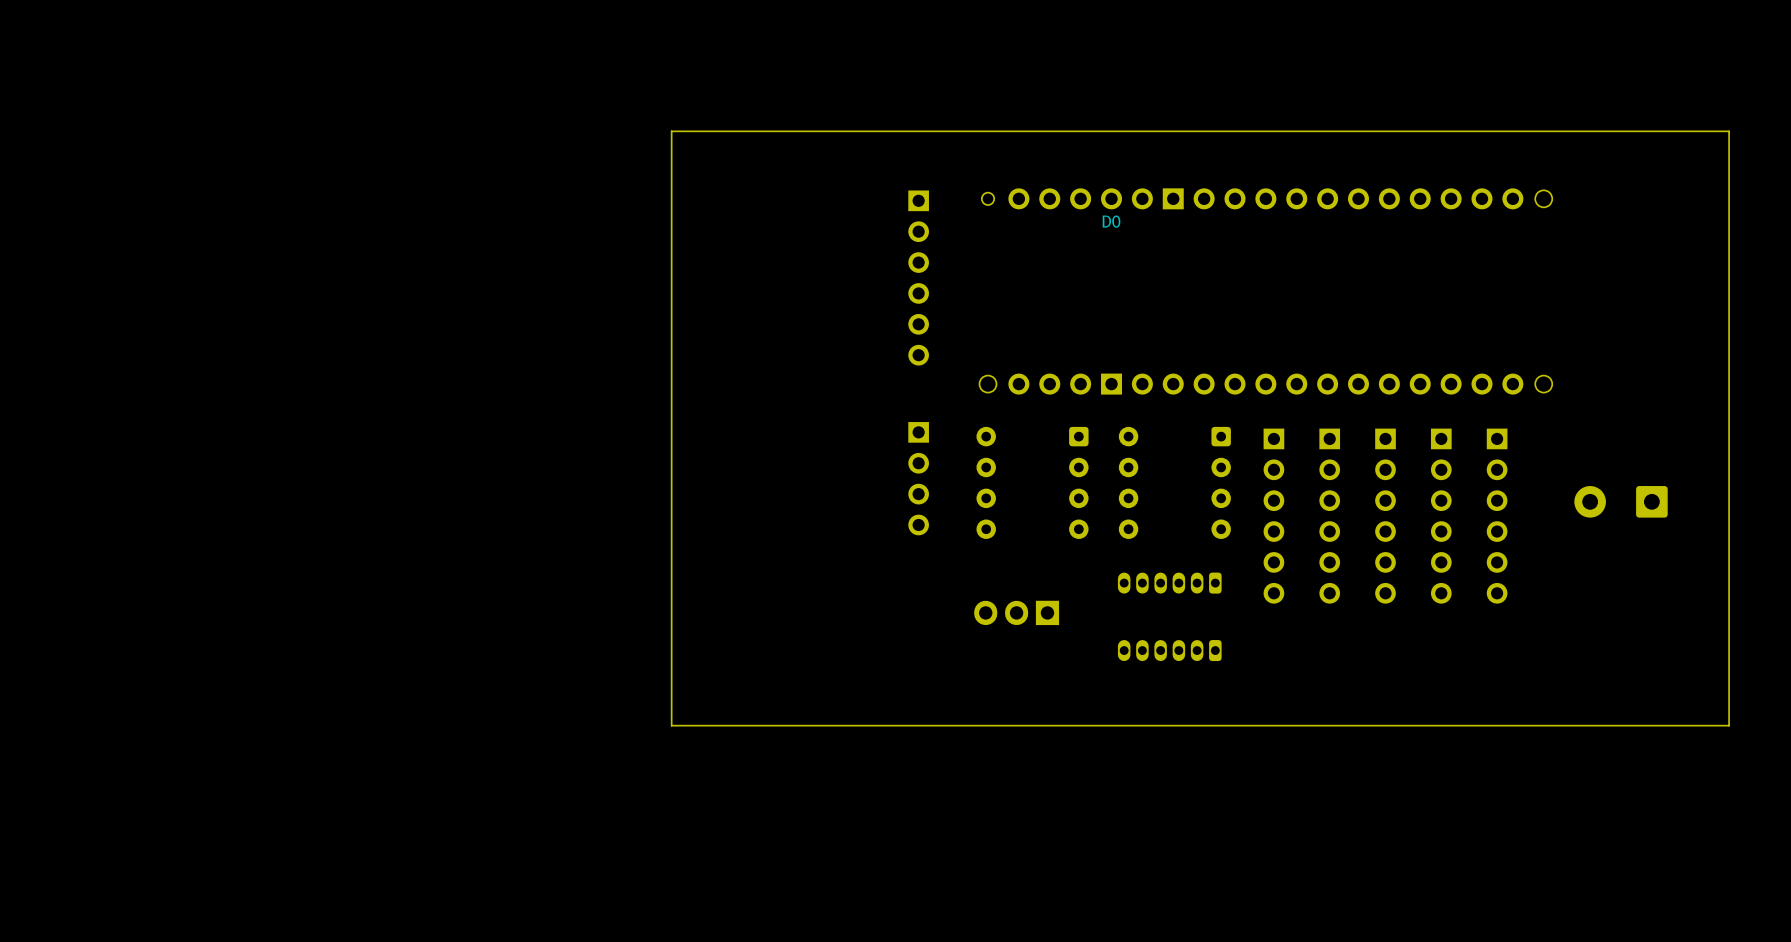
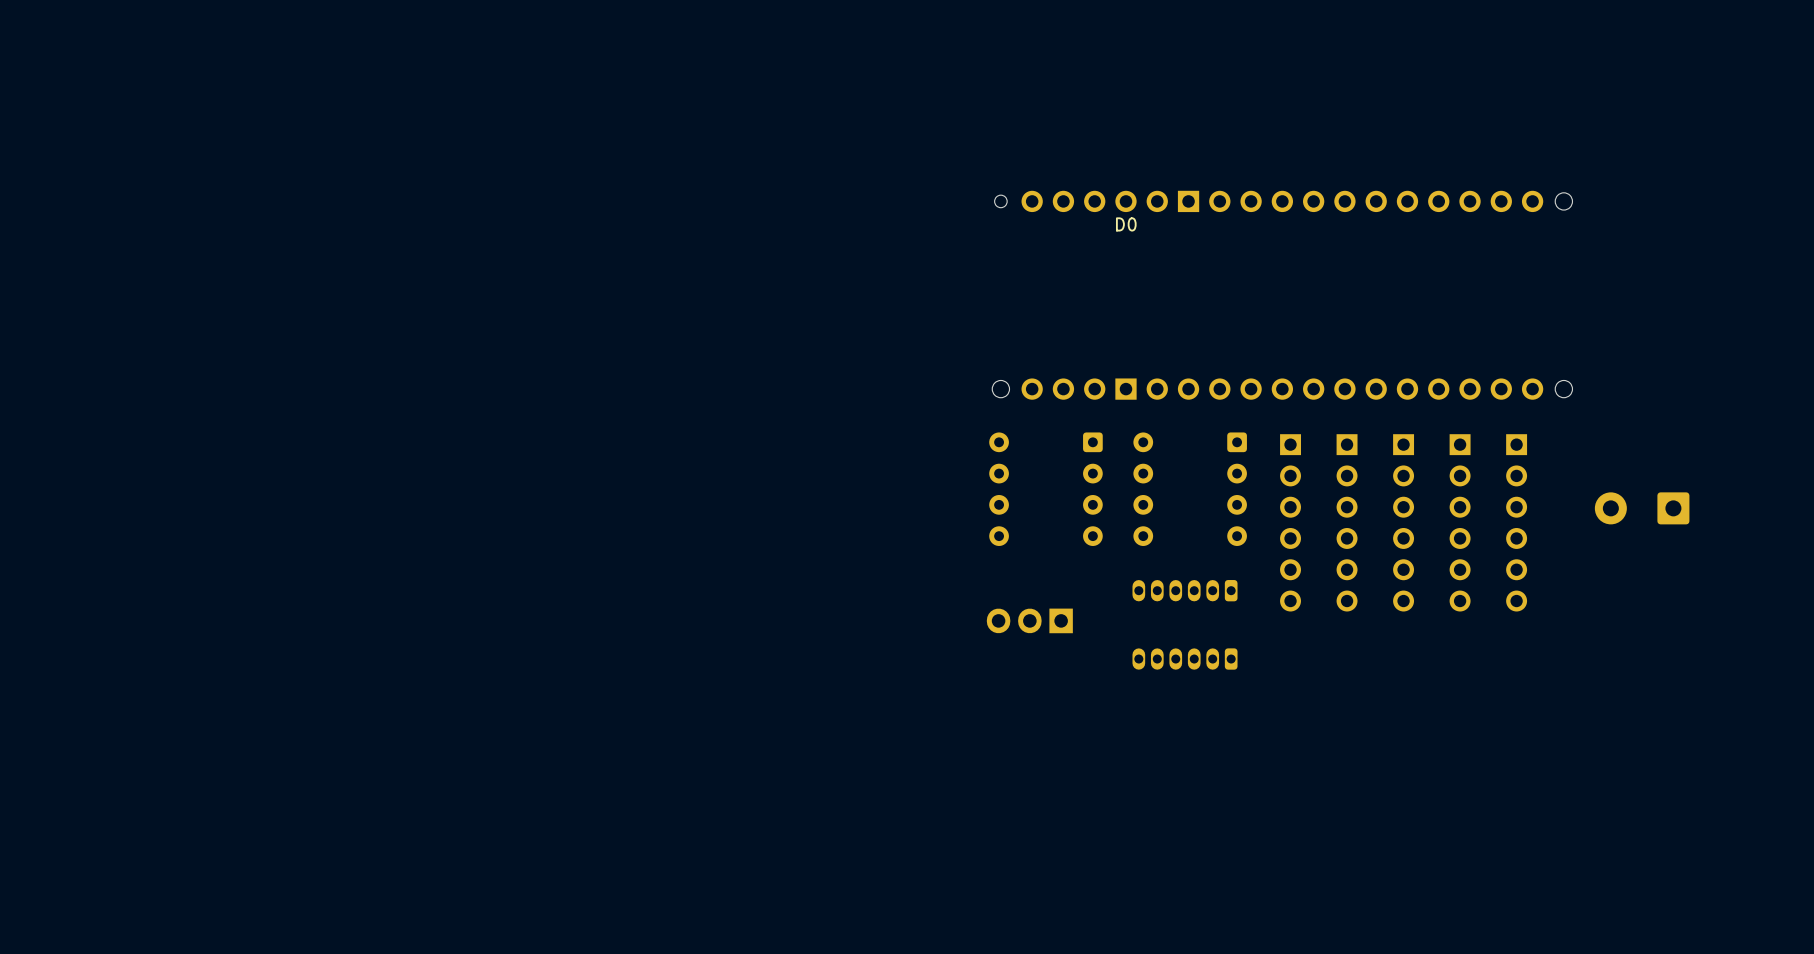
board edge: (1729, 131) (671, 131) (671, 725) (1729, 725) (1729, 131) -> none
part: (918, 277) -> none
part: (918, 478) -> none

